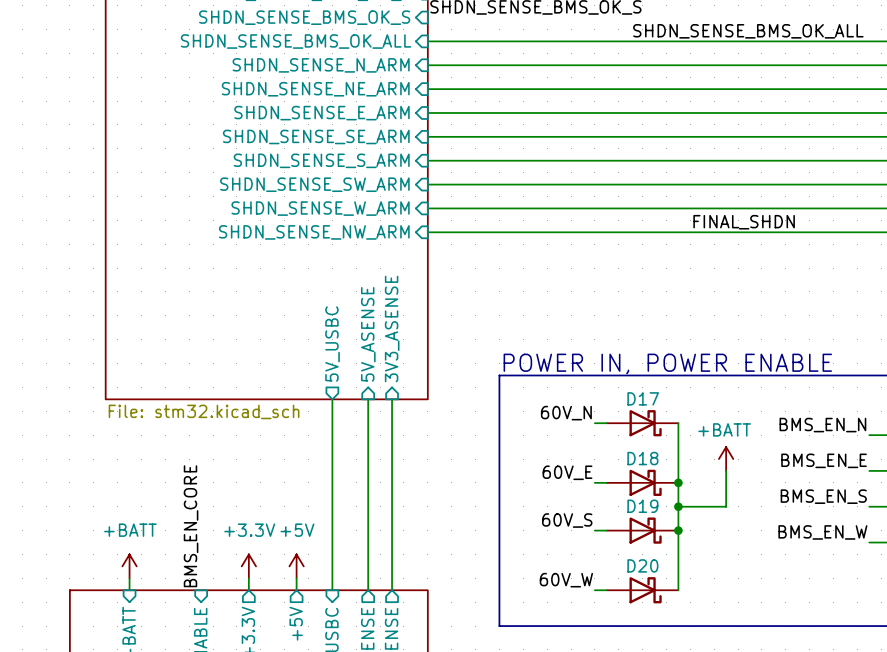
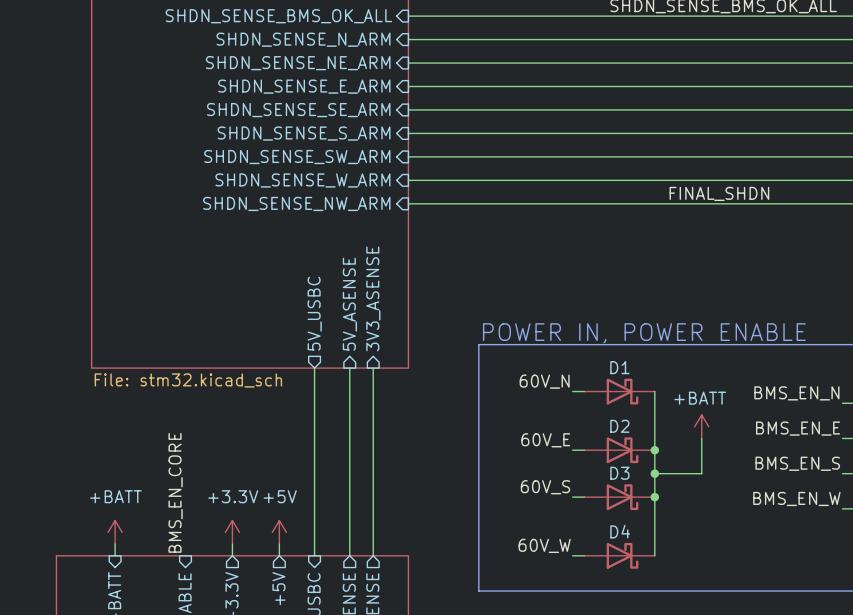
D17 name: D17 (643, 398) -> D1 (619, 367)
D18 name: D18 (642, 458) -> D2 (619, 426)
D19 name: D19 (642, 506) -> D3 (619, 473)
D20 name: D20 (642, 565) -> D4 (620, 531)

